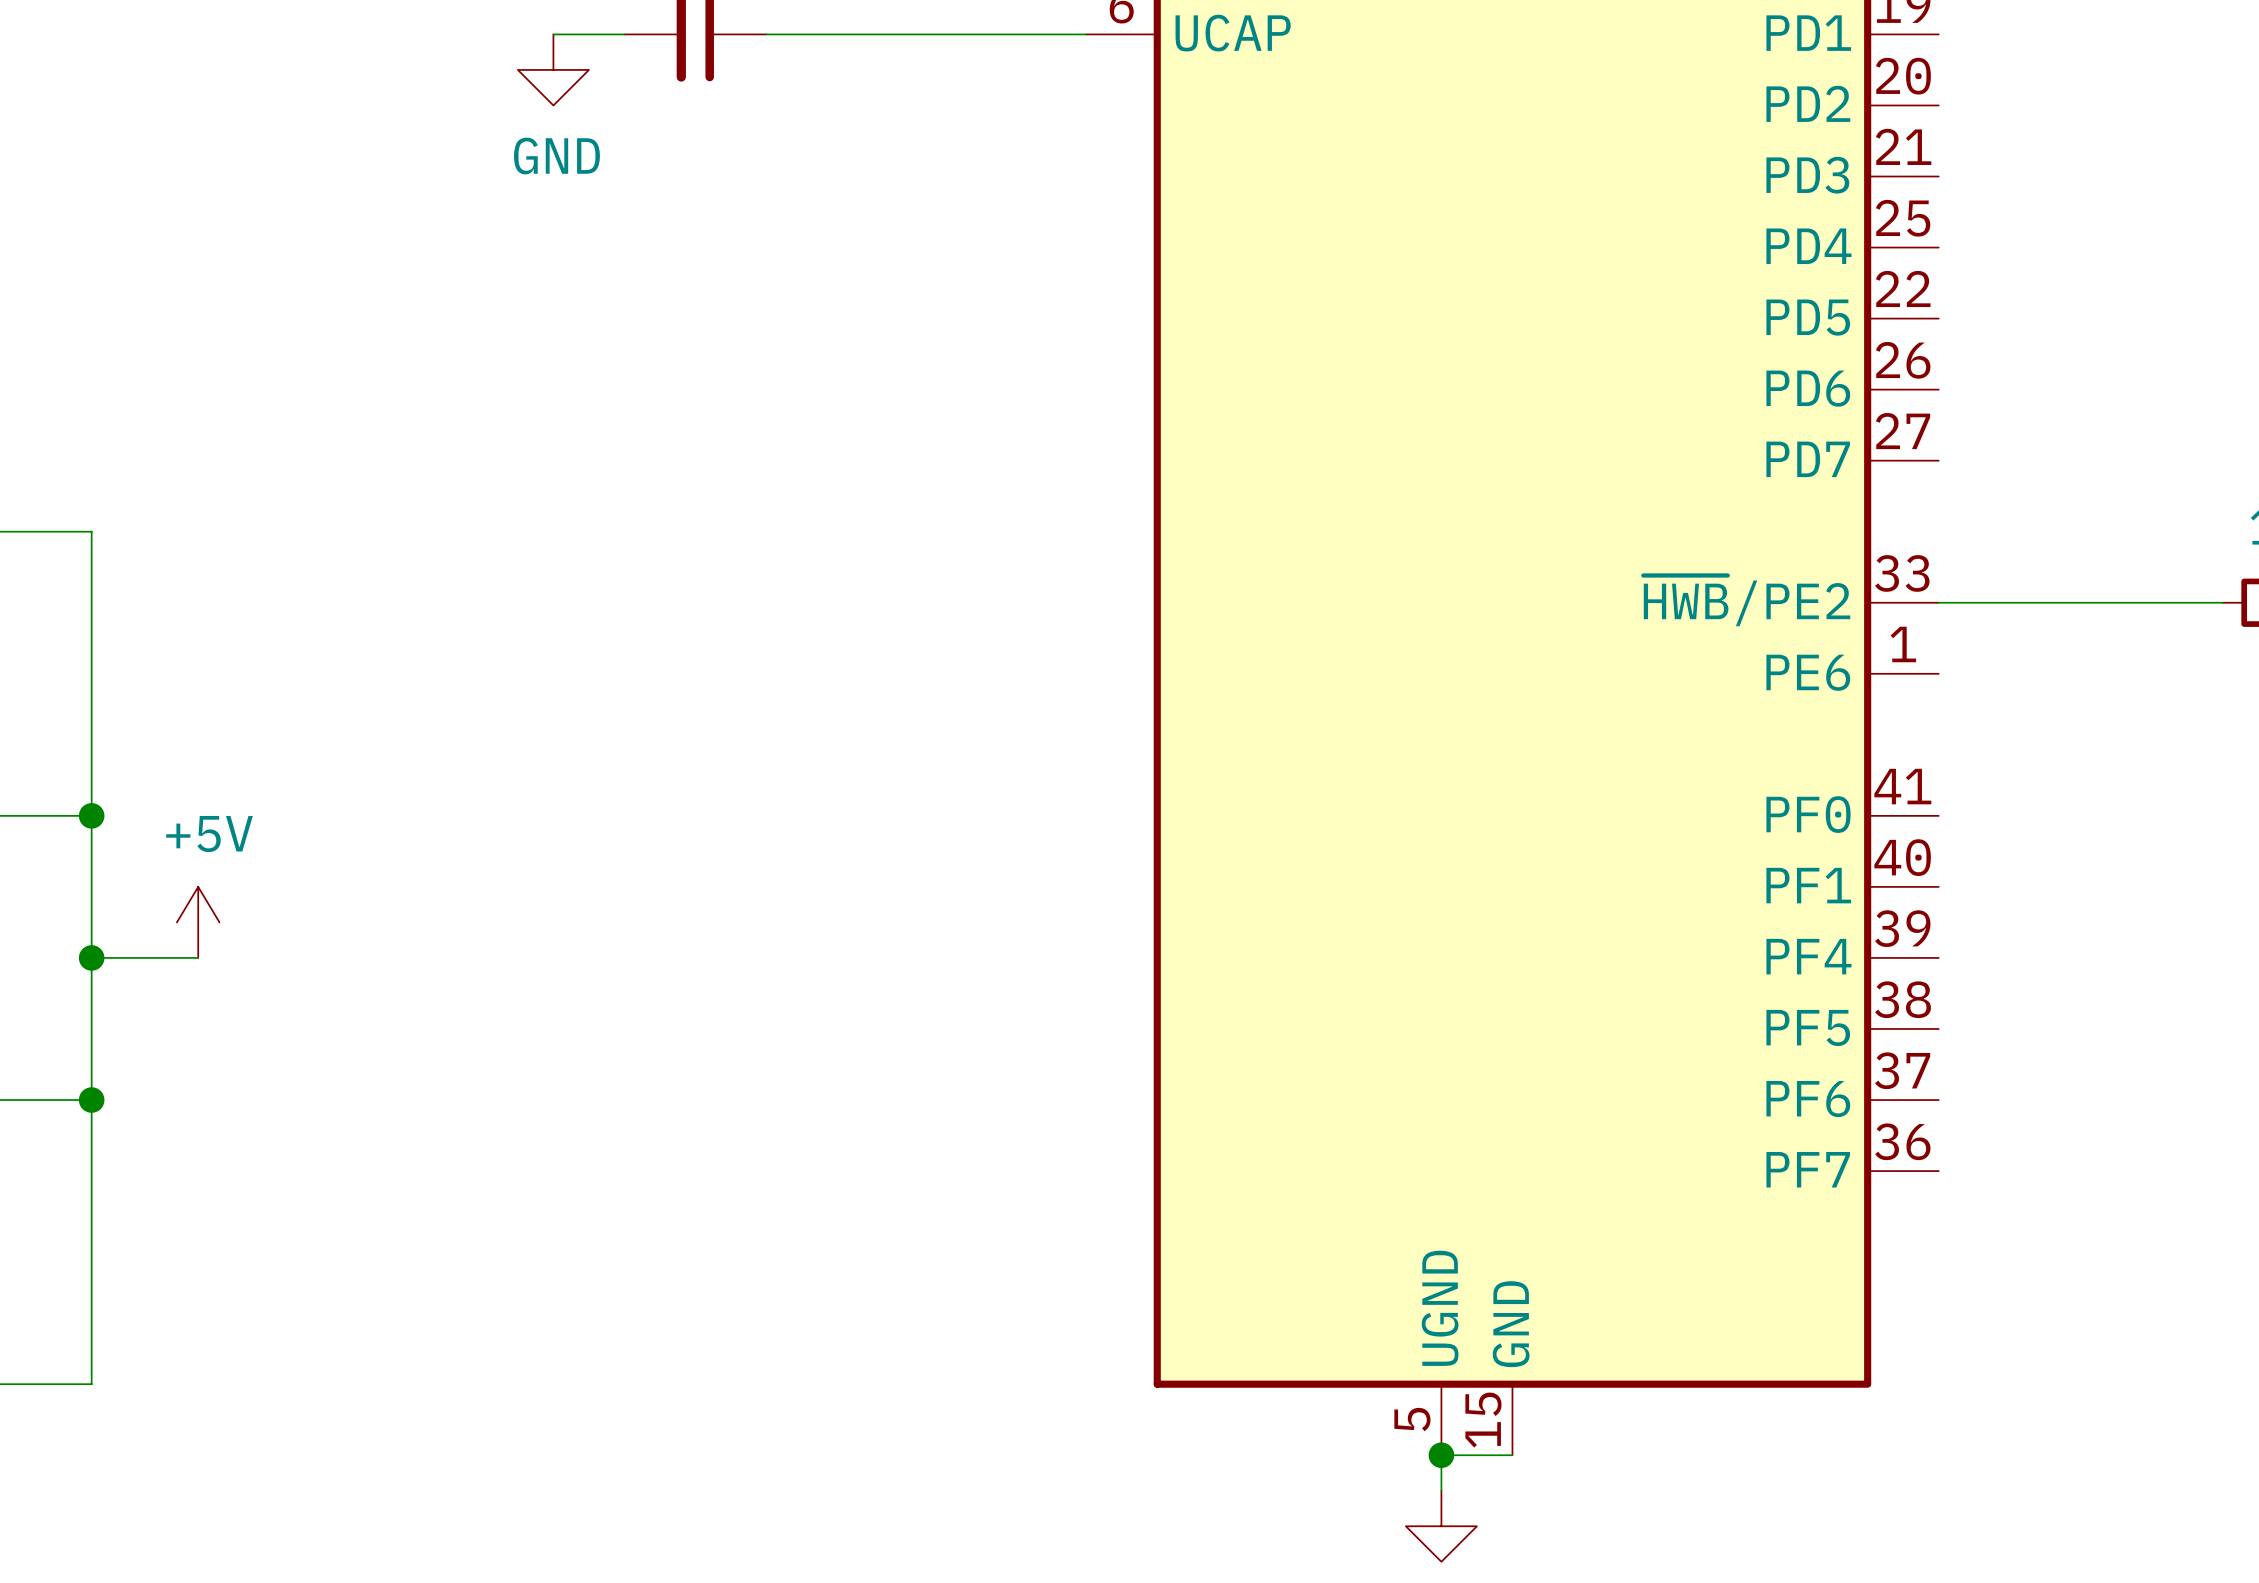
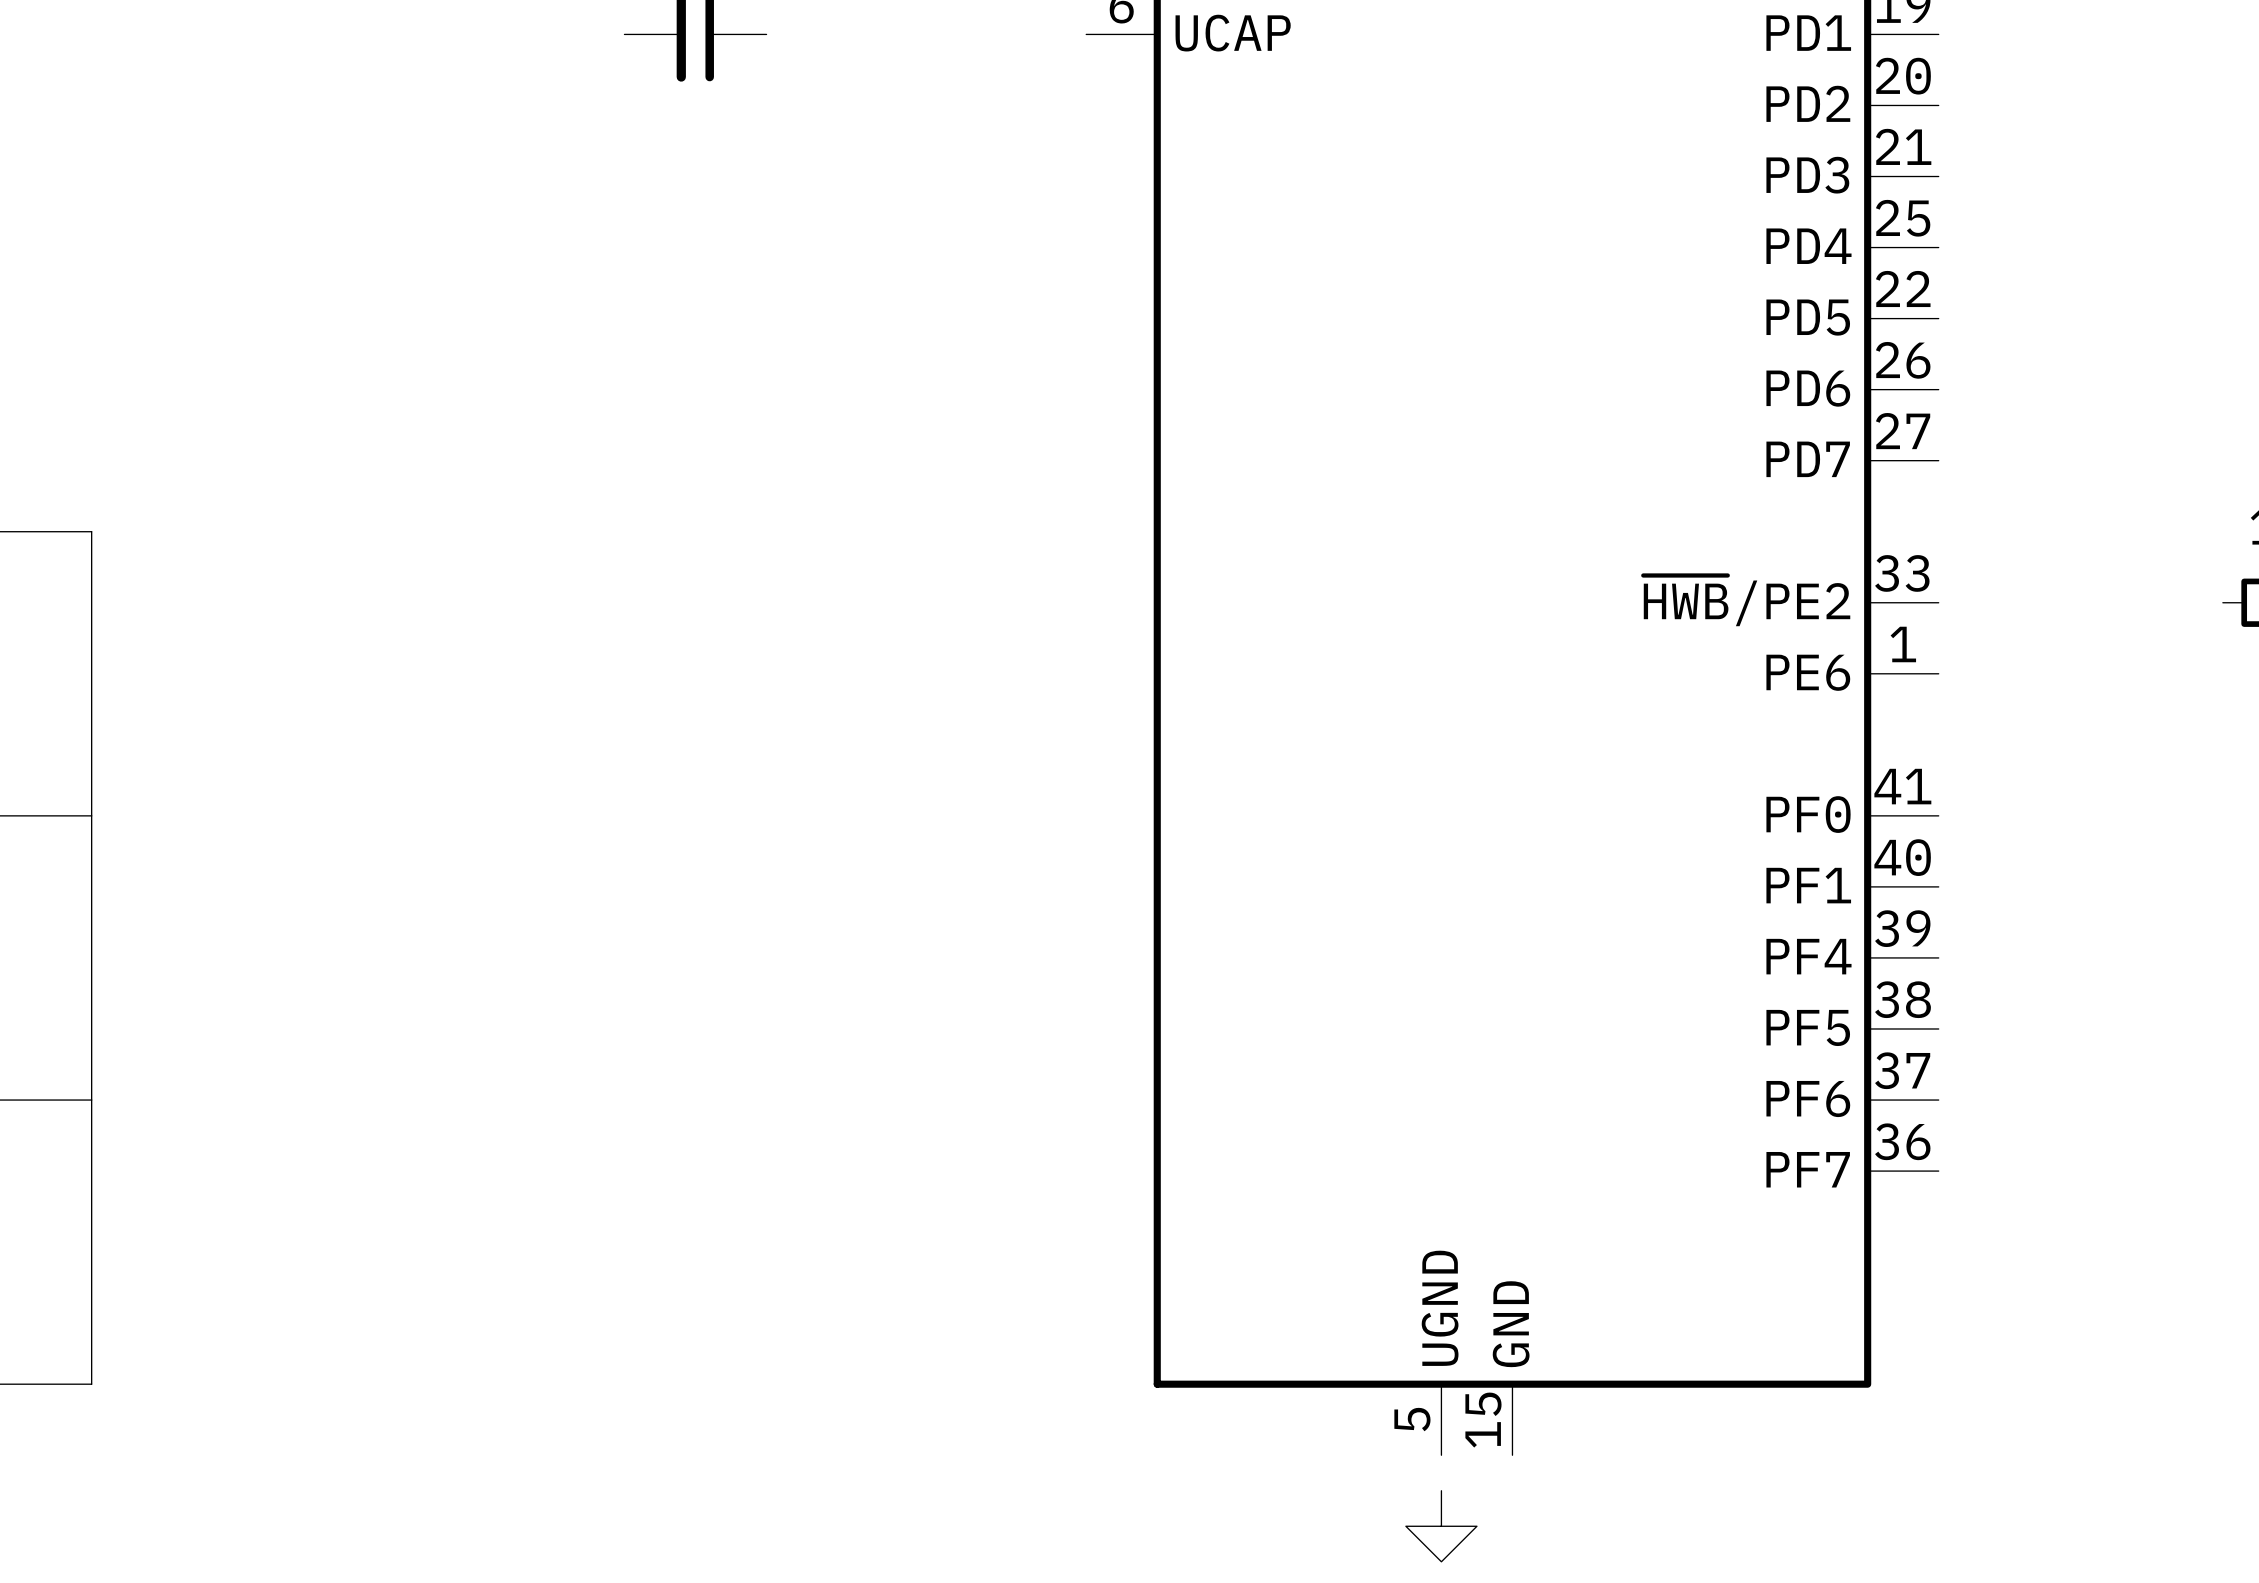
wire: (553, 34) (624, 34) -> none
wire: (766, 34) (1086, 34) -> none
power symbol: GND (553, 69) -> none
wire: (1938, 602) (2222, 602) -> none
junction: (91, 815) -> none
power symbol: +5V (198, 922) -> none
wire: (91, 957) (198, 957) -> none
junction: (91, 957) -> none
junction: (91, 1100) -> none
junction: (1441, 1455) -> none
wire: (1512, 1455) (1441, 1455) (1441, 1490) -> none

